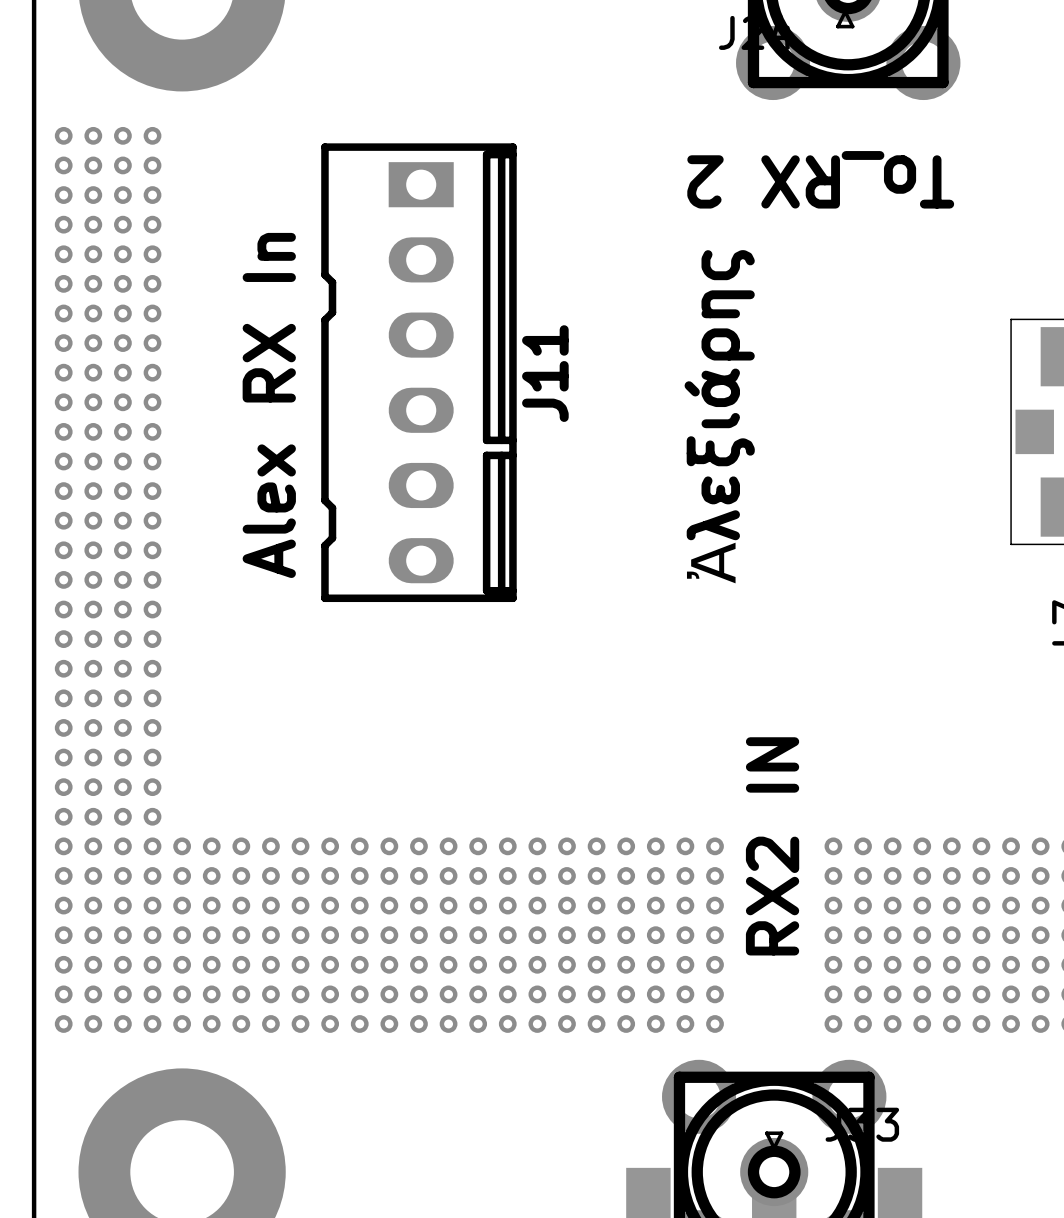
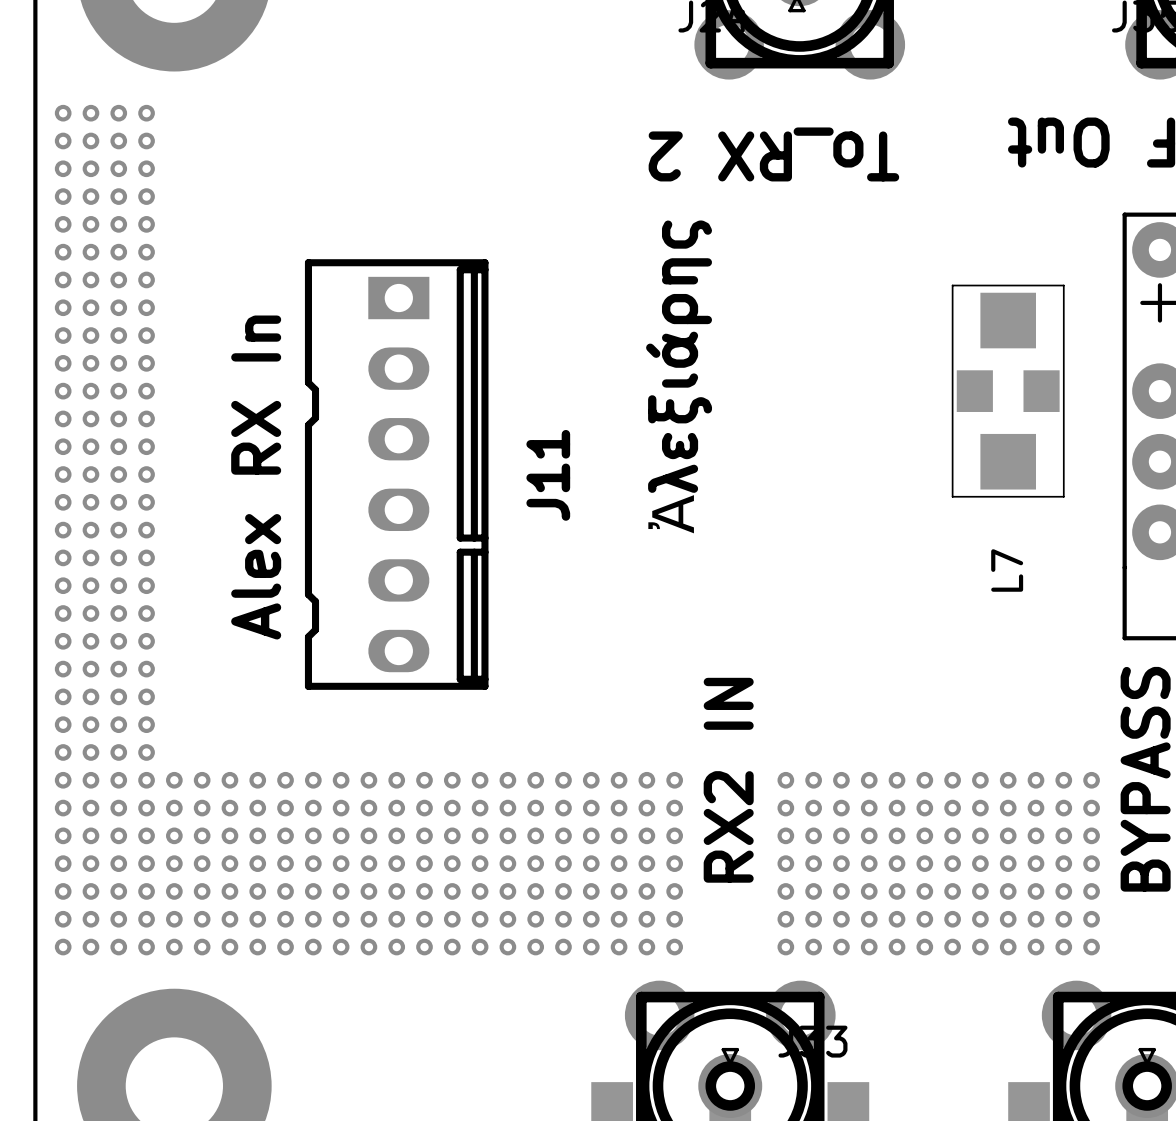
J11 position: (418, 372) -> (396, 474)
J11 name position: J11 (545, 373) -> J11 (548, 475)
text position: Alex RX In (269, 405) -> Alex RX In (256, 477)

